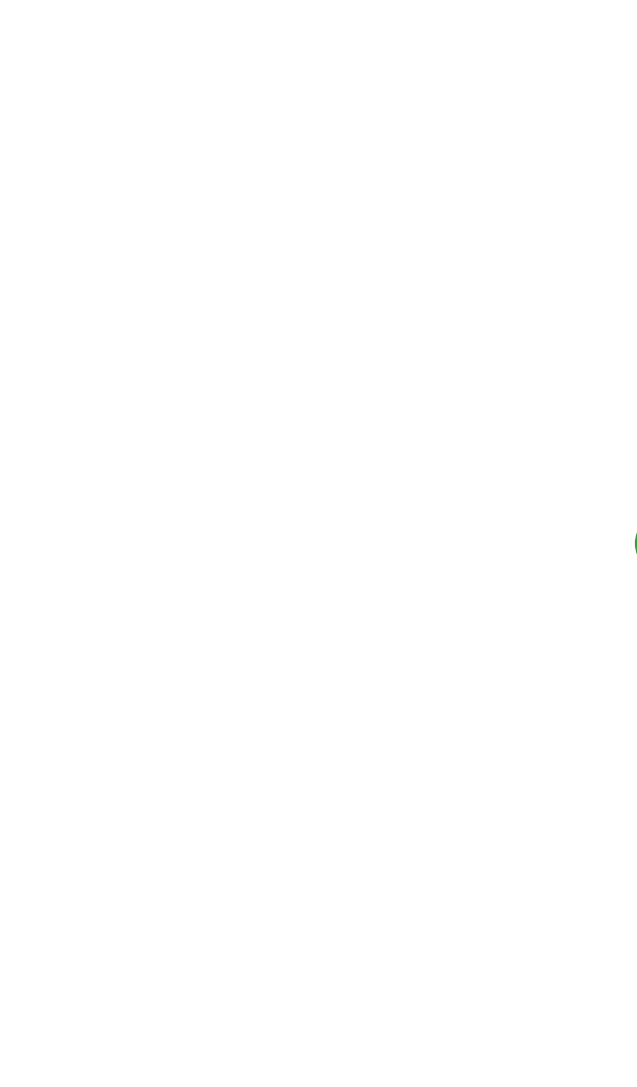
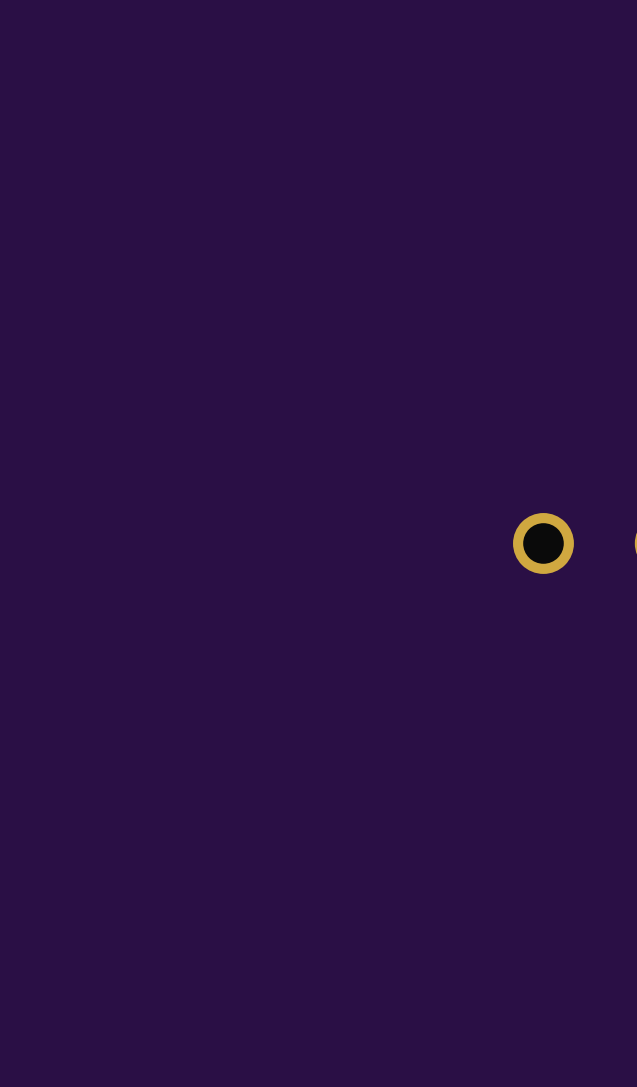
via: none -> (543, 543)

